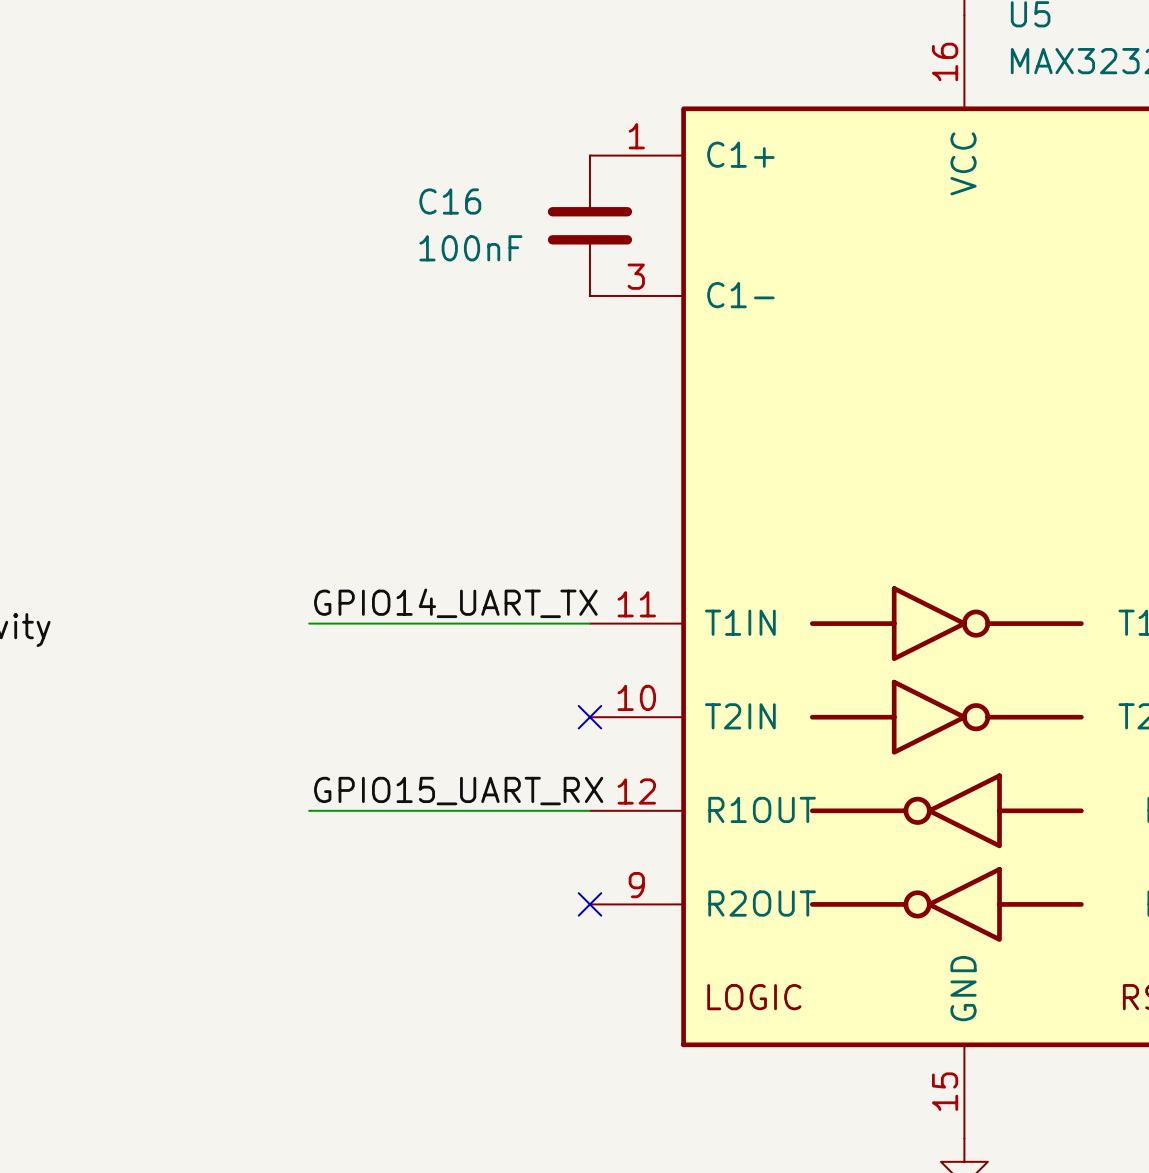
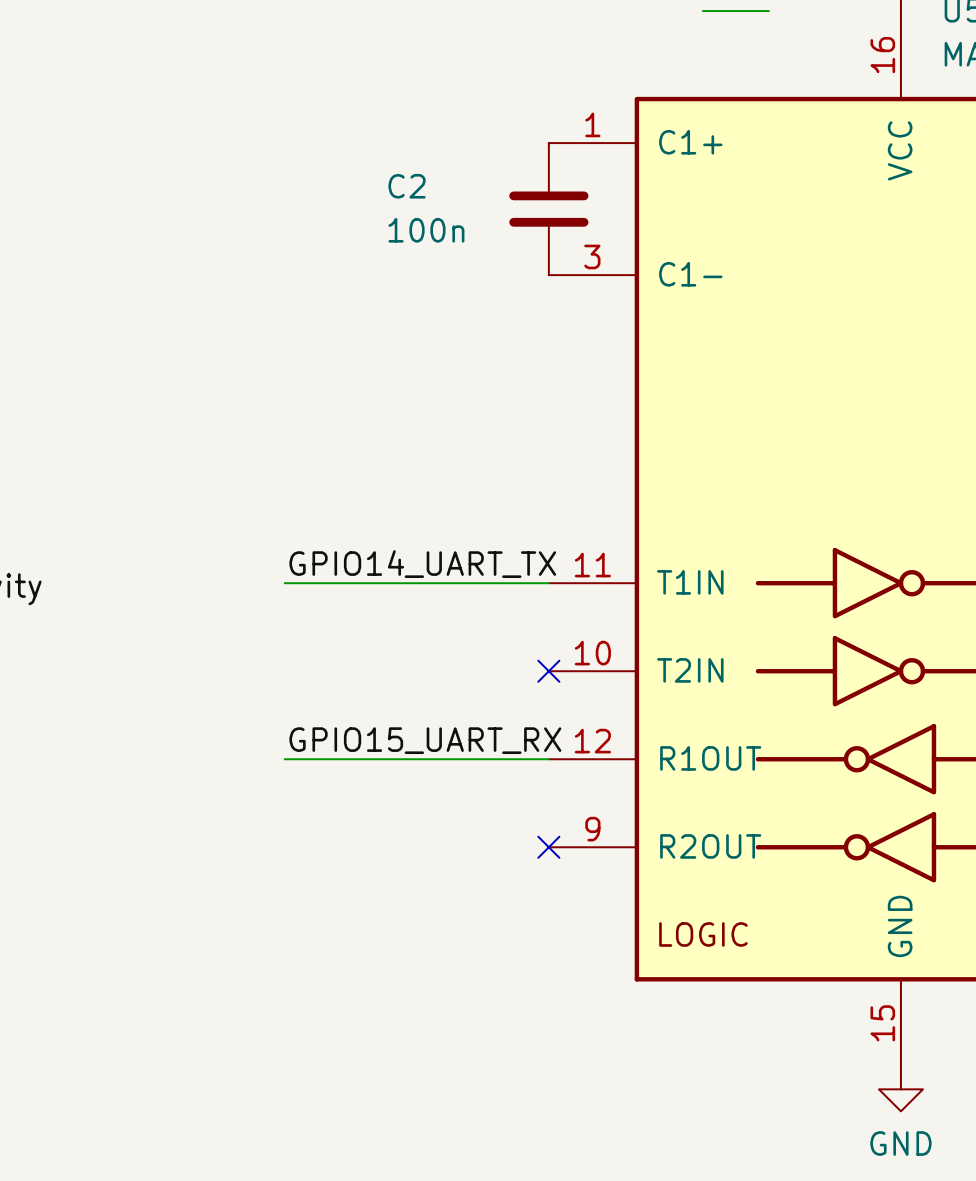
wire: none -> (702, 11) (768, 11)
C16 name: C16 (450, 201) -> C2 (407, 186)
C16 value: 100nF (470, 248) -> 100n (426, 230)

